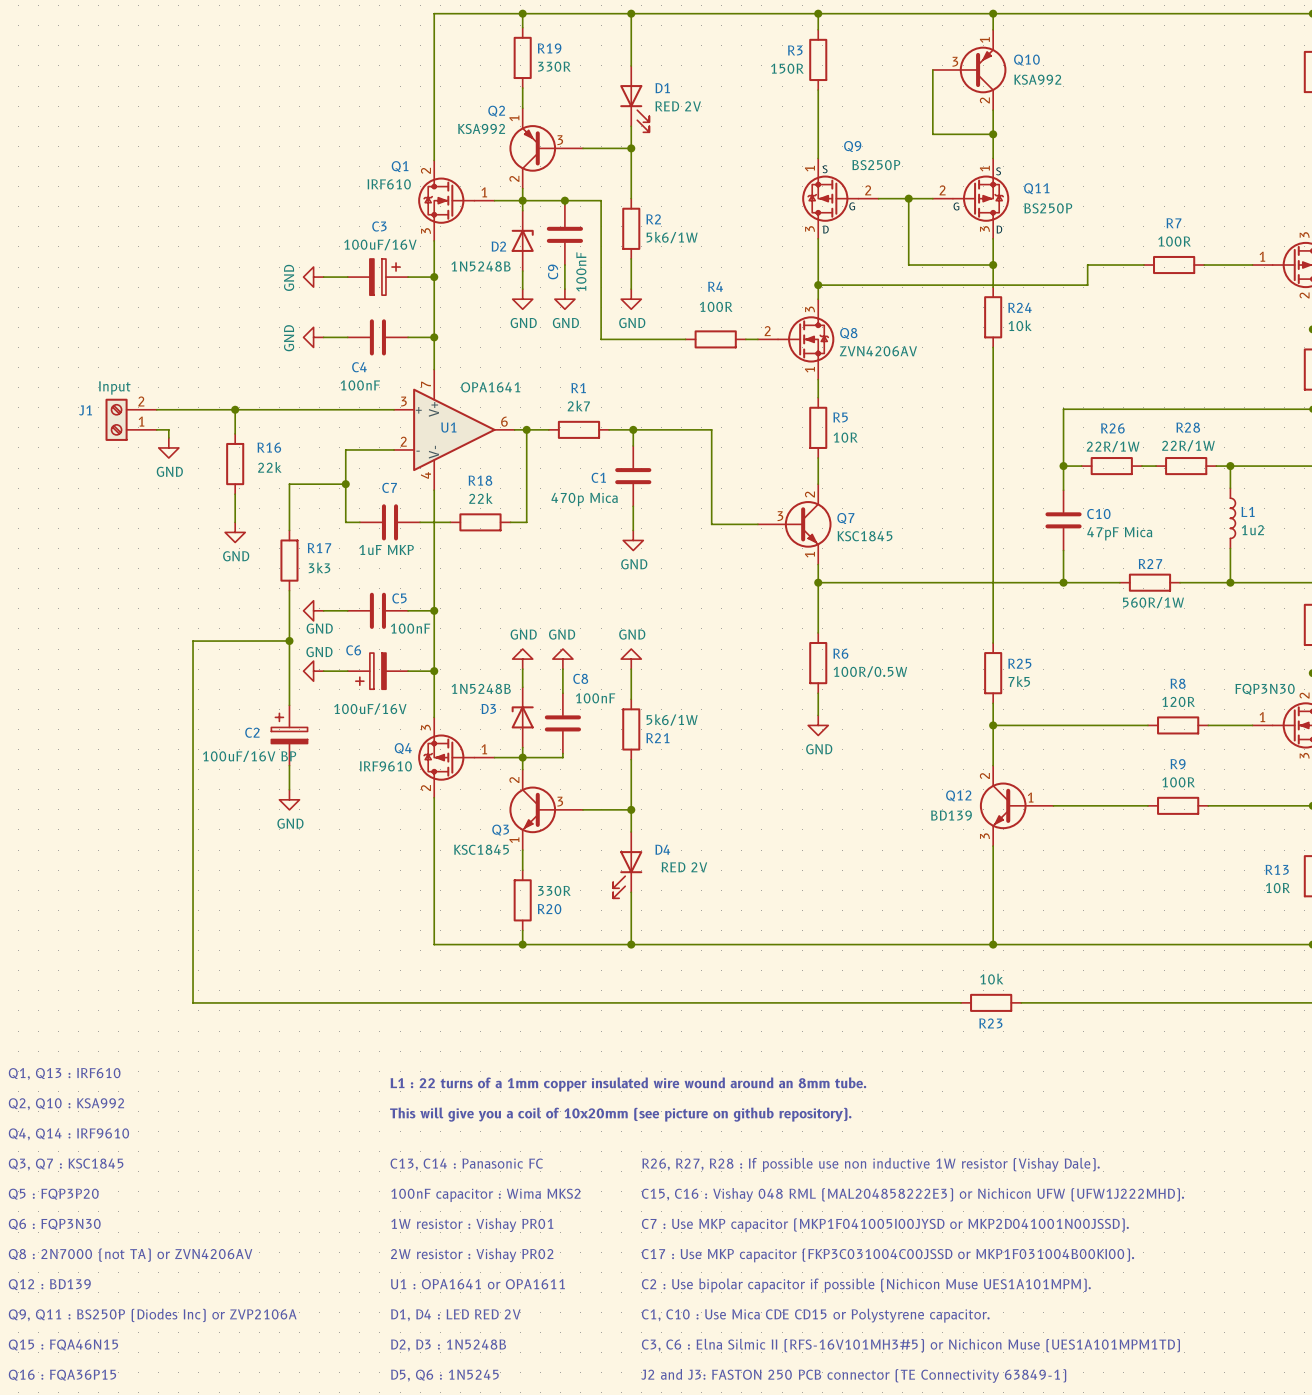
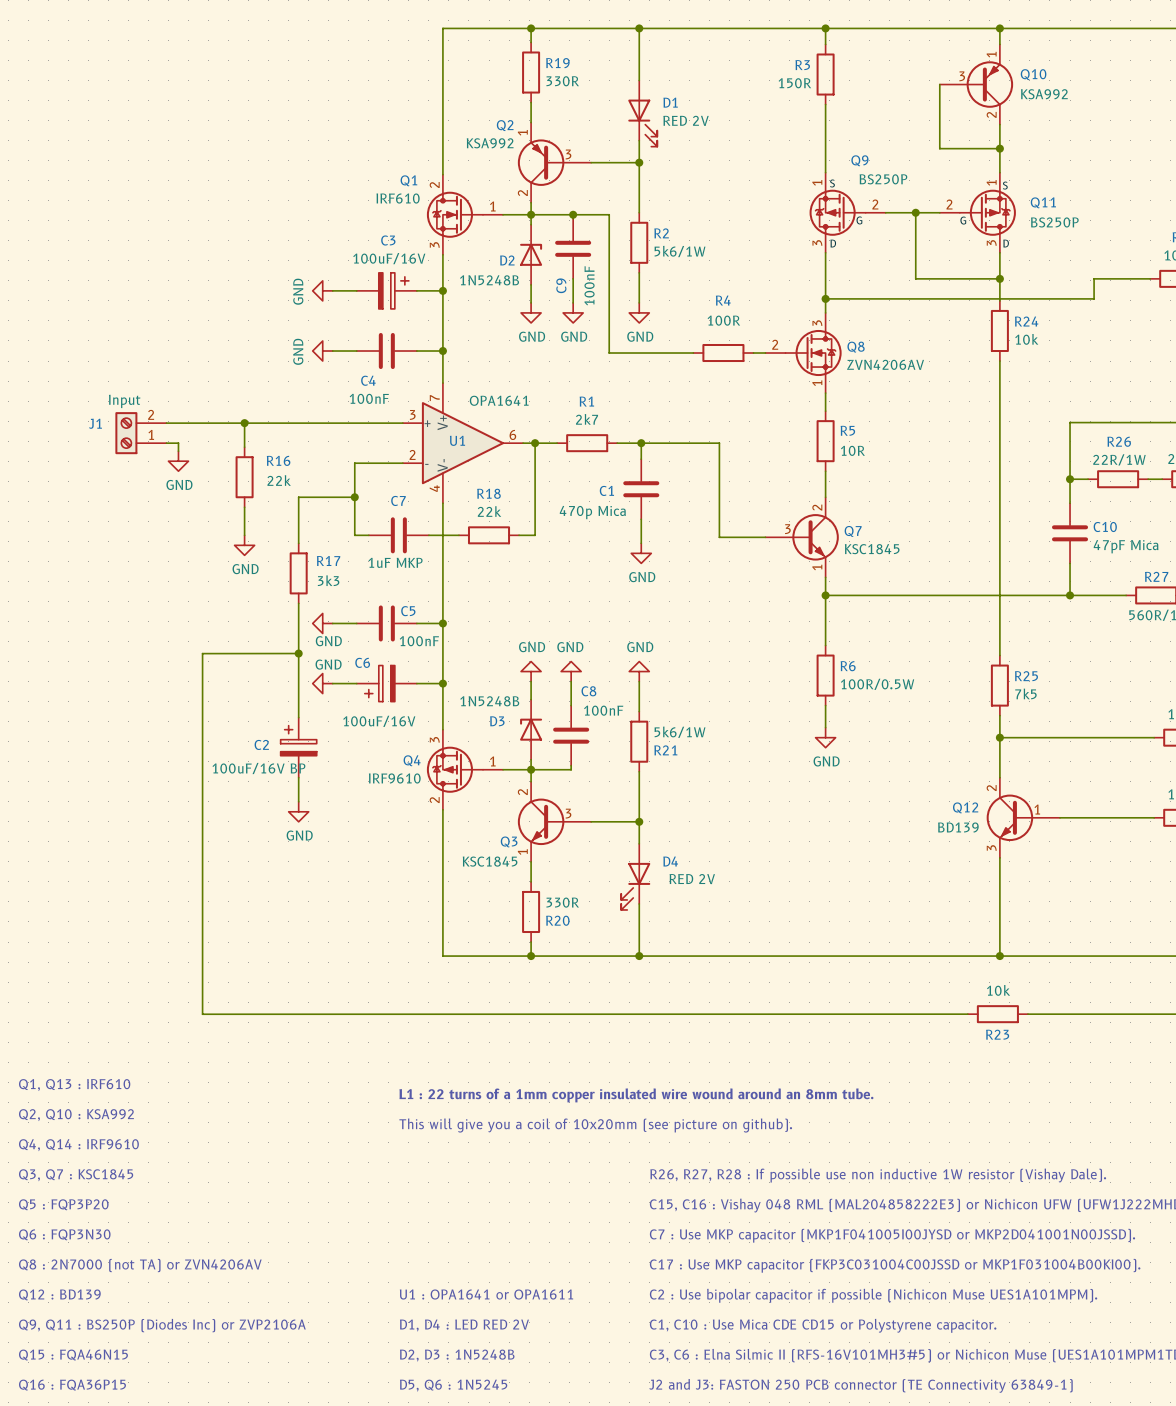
text: This will give you a coil of 10x20mm (see picture on github repository). (620, 1114) -> This will give you a coil of 10x20mm (see picture on github). (595, 1125)
text: C13, C14 : Panasonic FC (466, 1164) -> none
text: 100nF capacitor : Wima MKS2 (485, 1195) -> none
text: 1W resistor : Vishay PR01 (472, 1225) -> none
text: 2W resistor : Vishay PR02 (472, 1255) -> none

